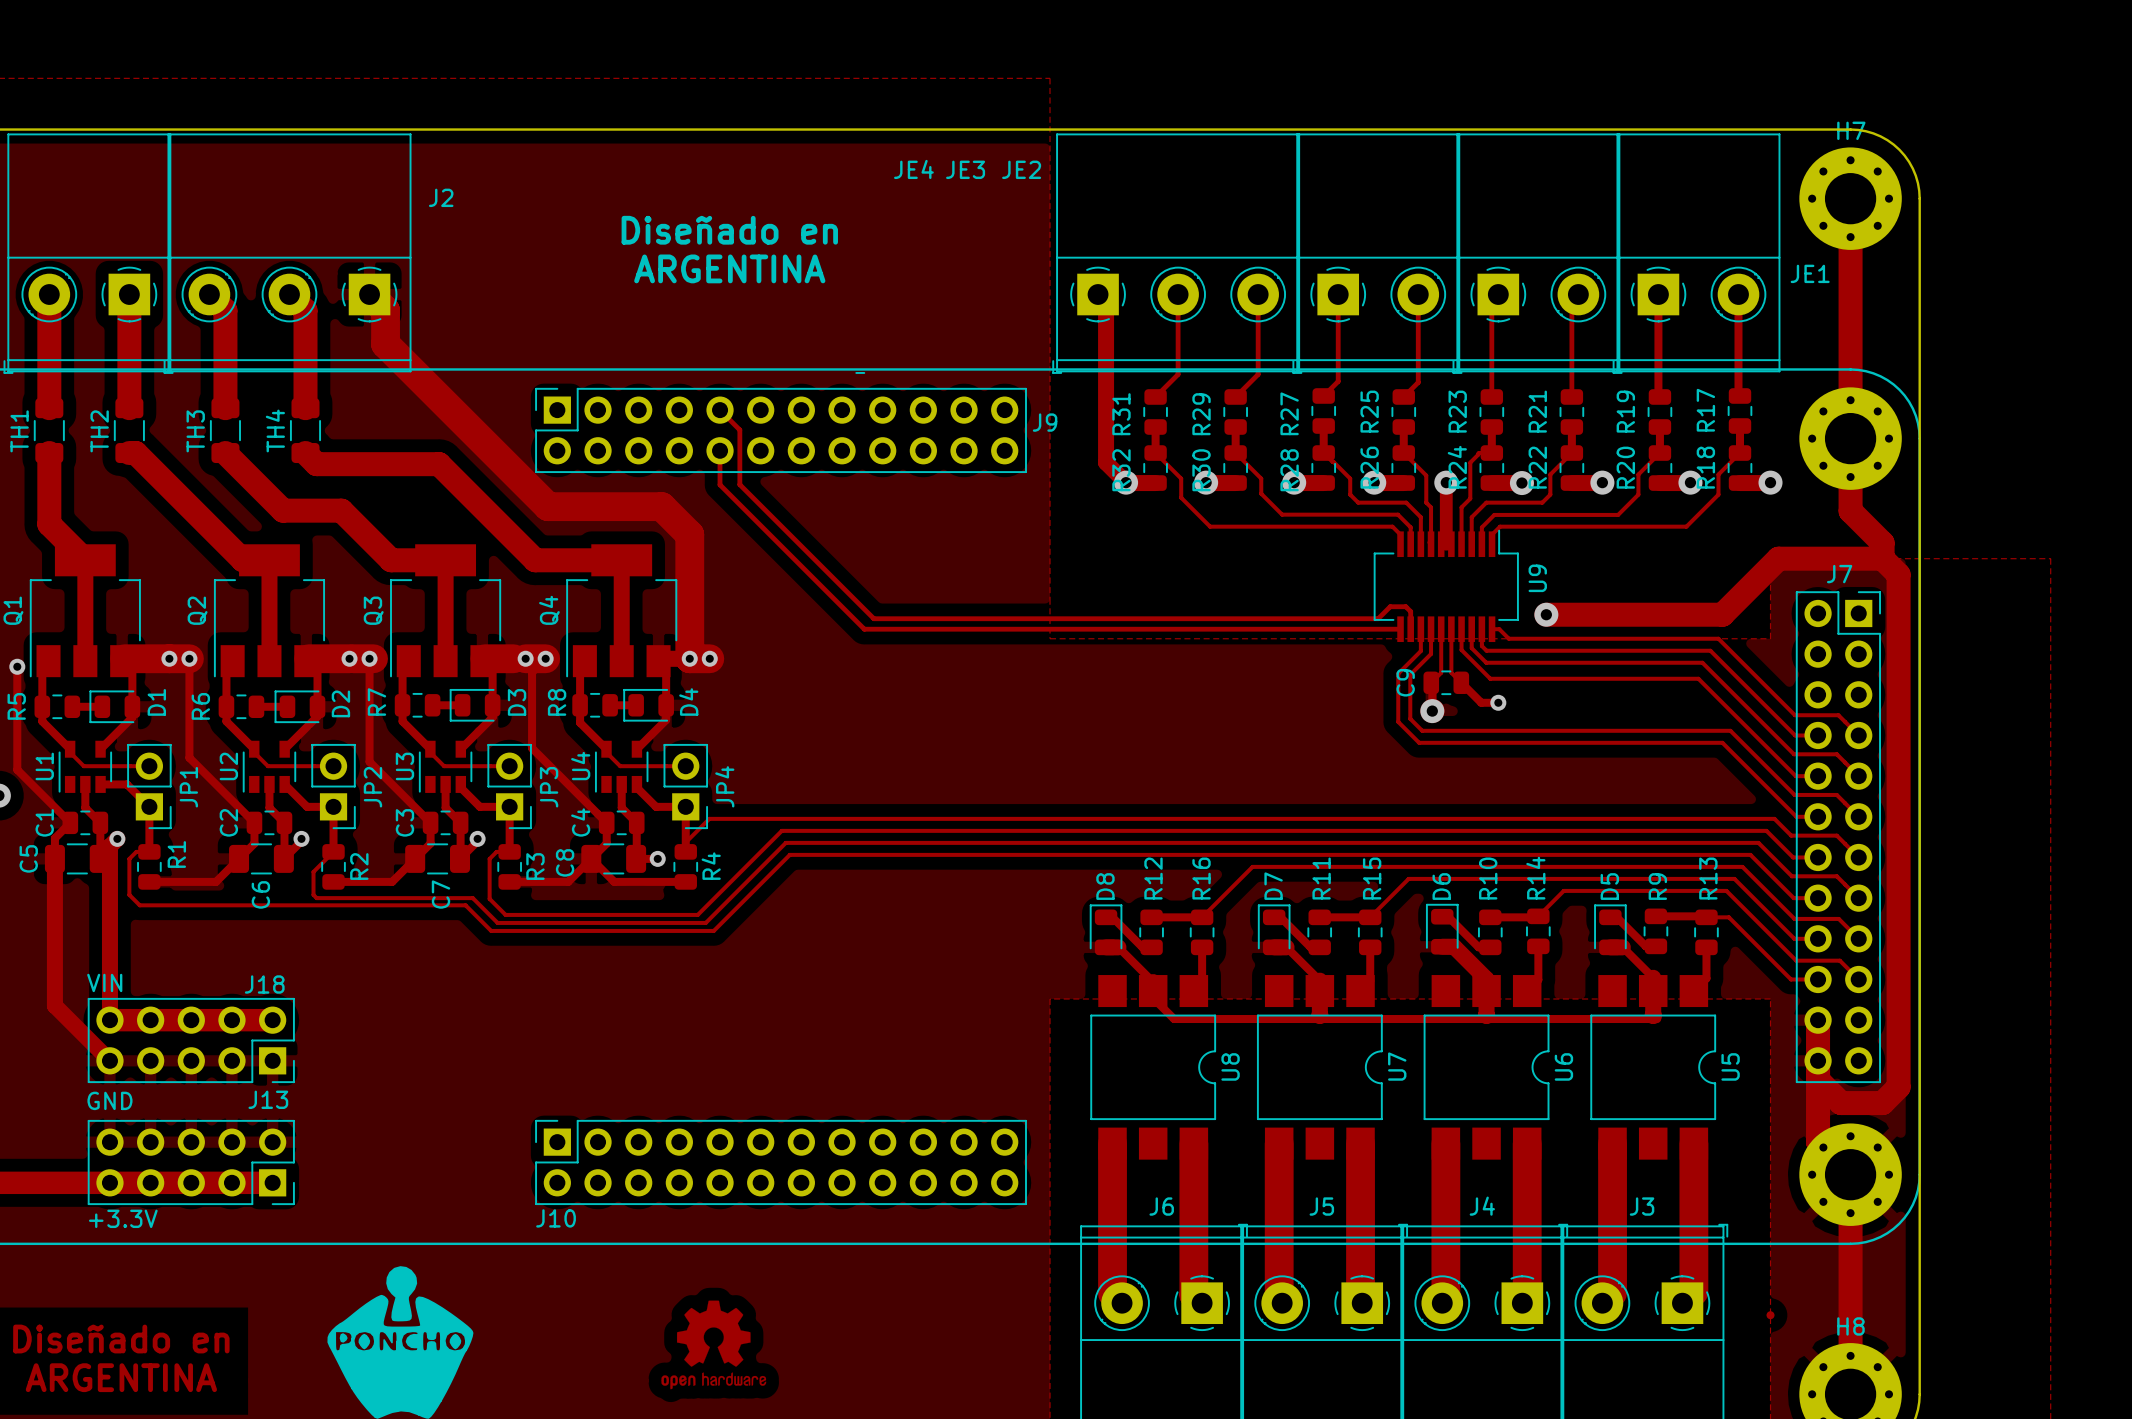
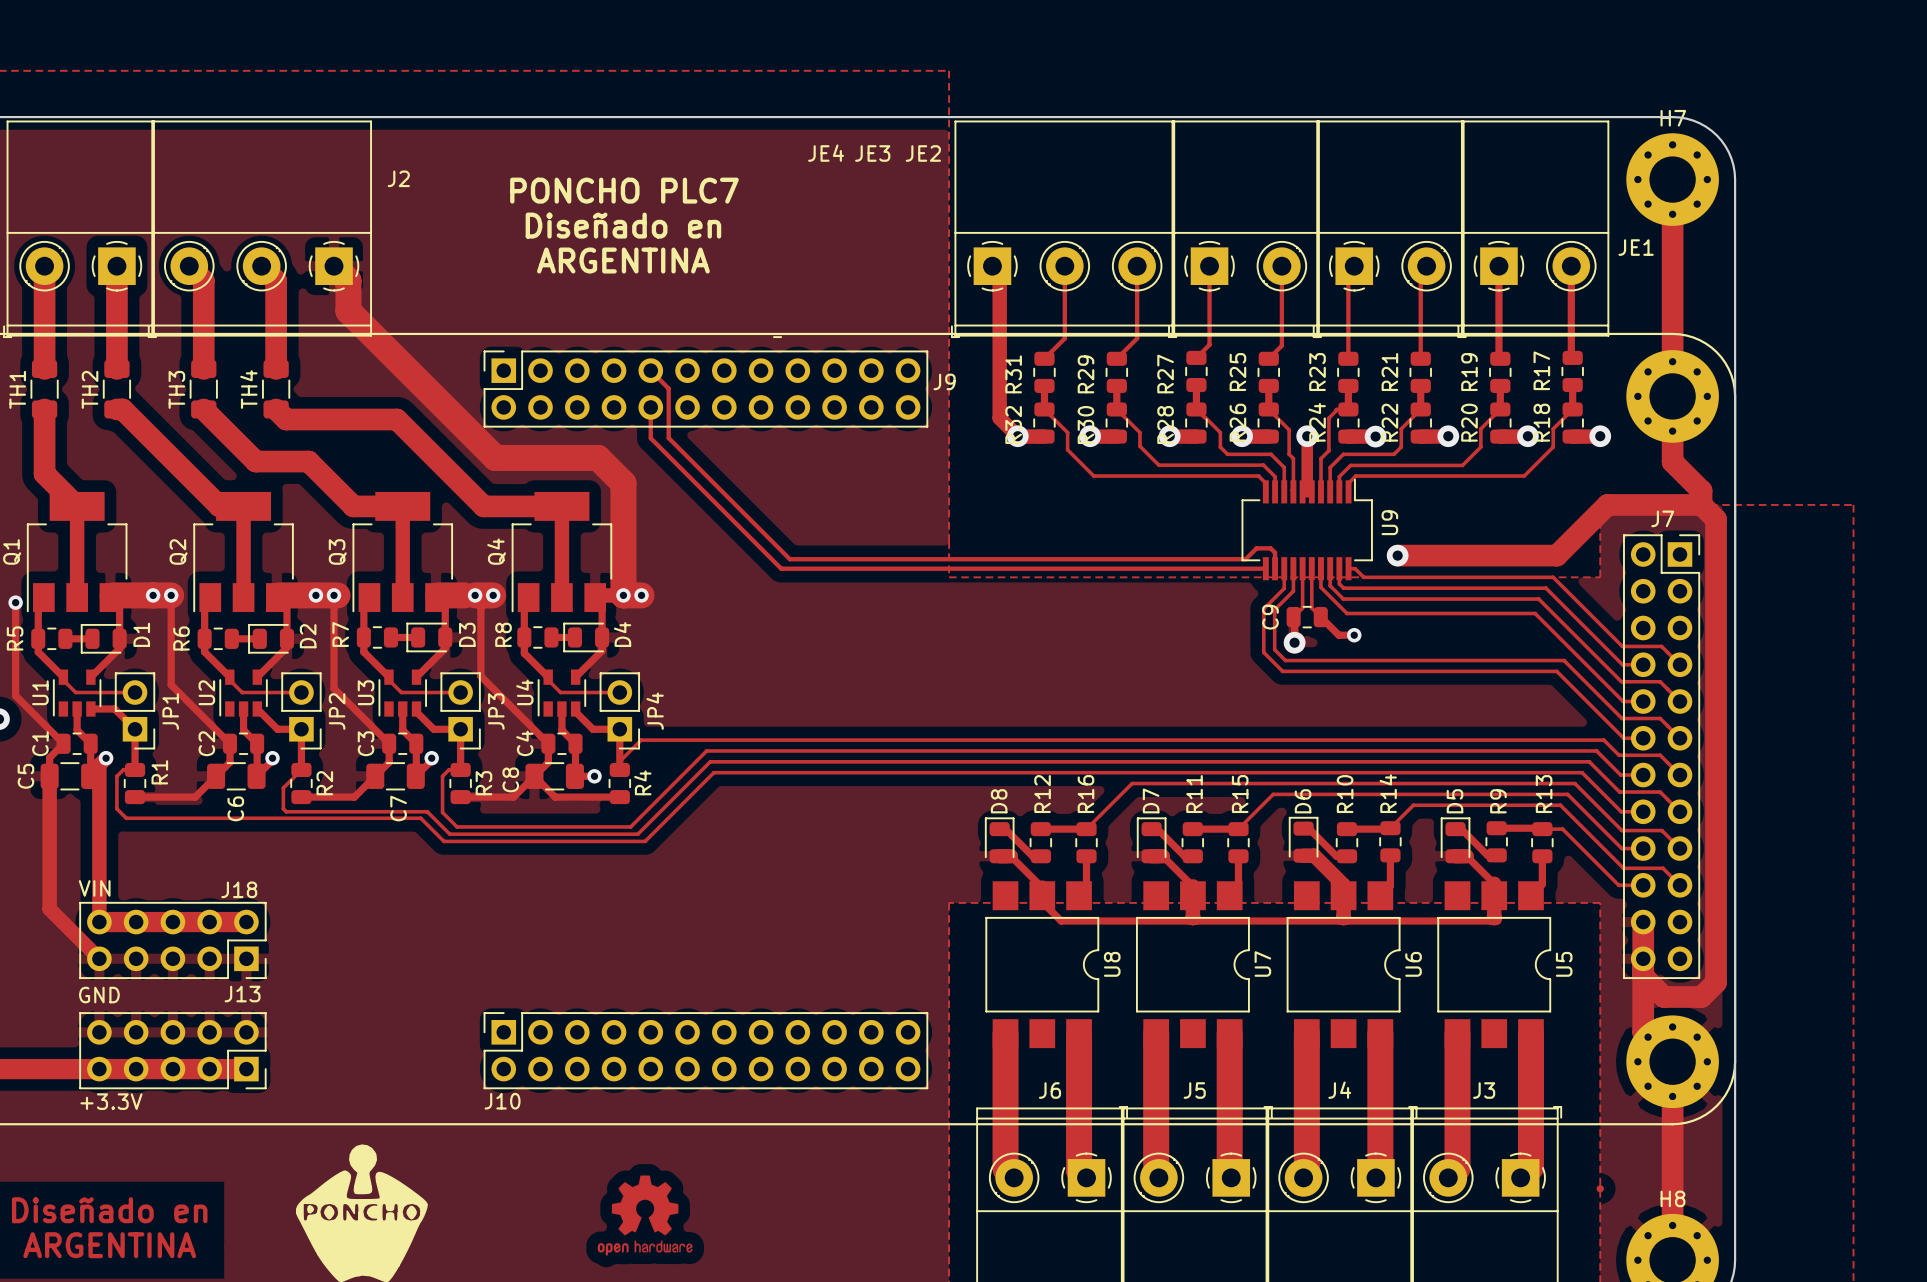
text: none -> PONCHO PLC7 (624, 190)
text position: Diseñado en (729, 230) -> Diseñado en (623, 225)
text position: ARGENTINA (729, 268) -> ARGENTINA (623, 260)

